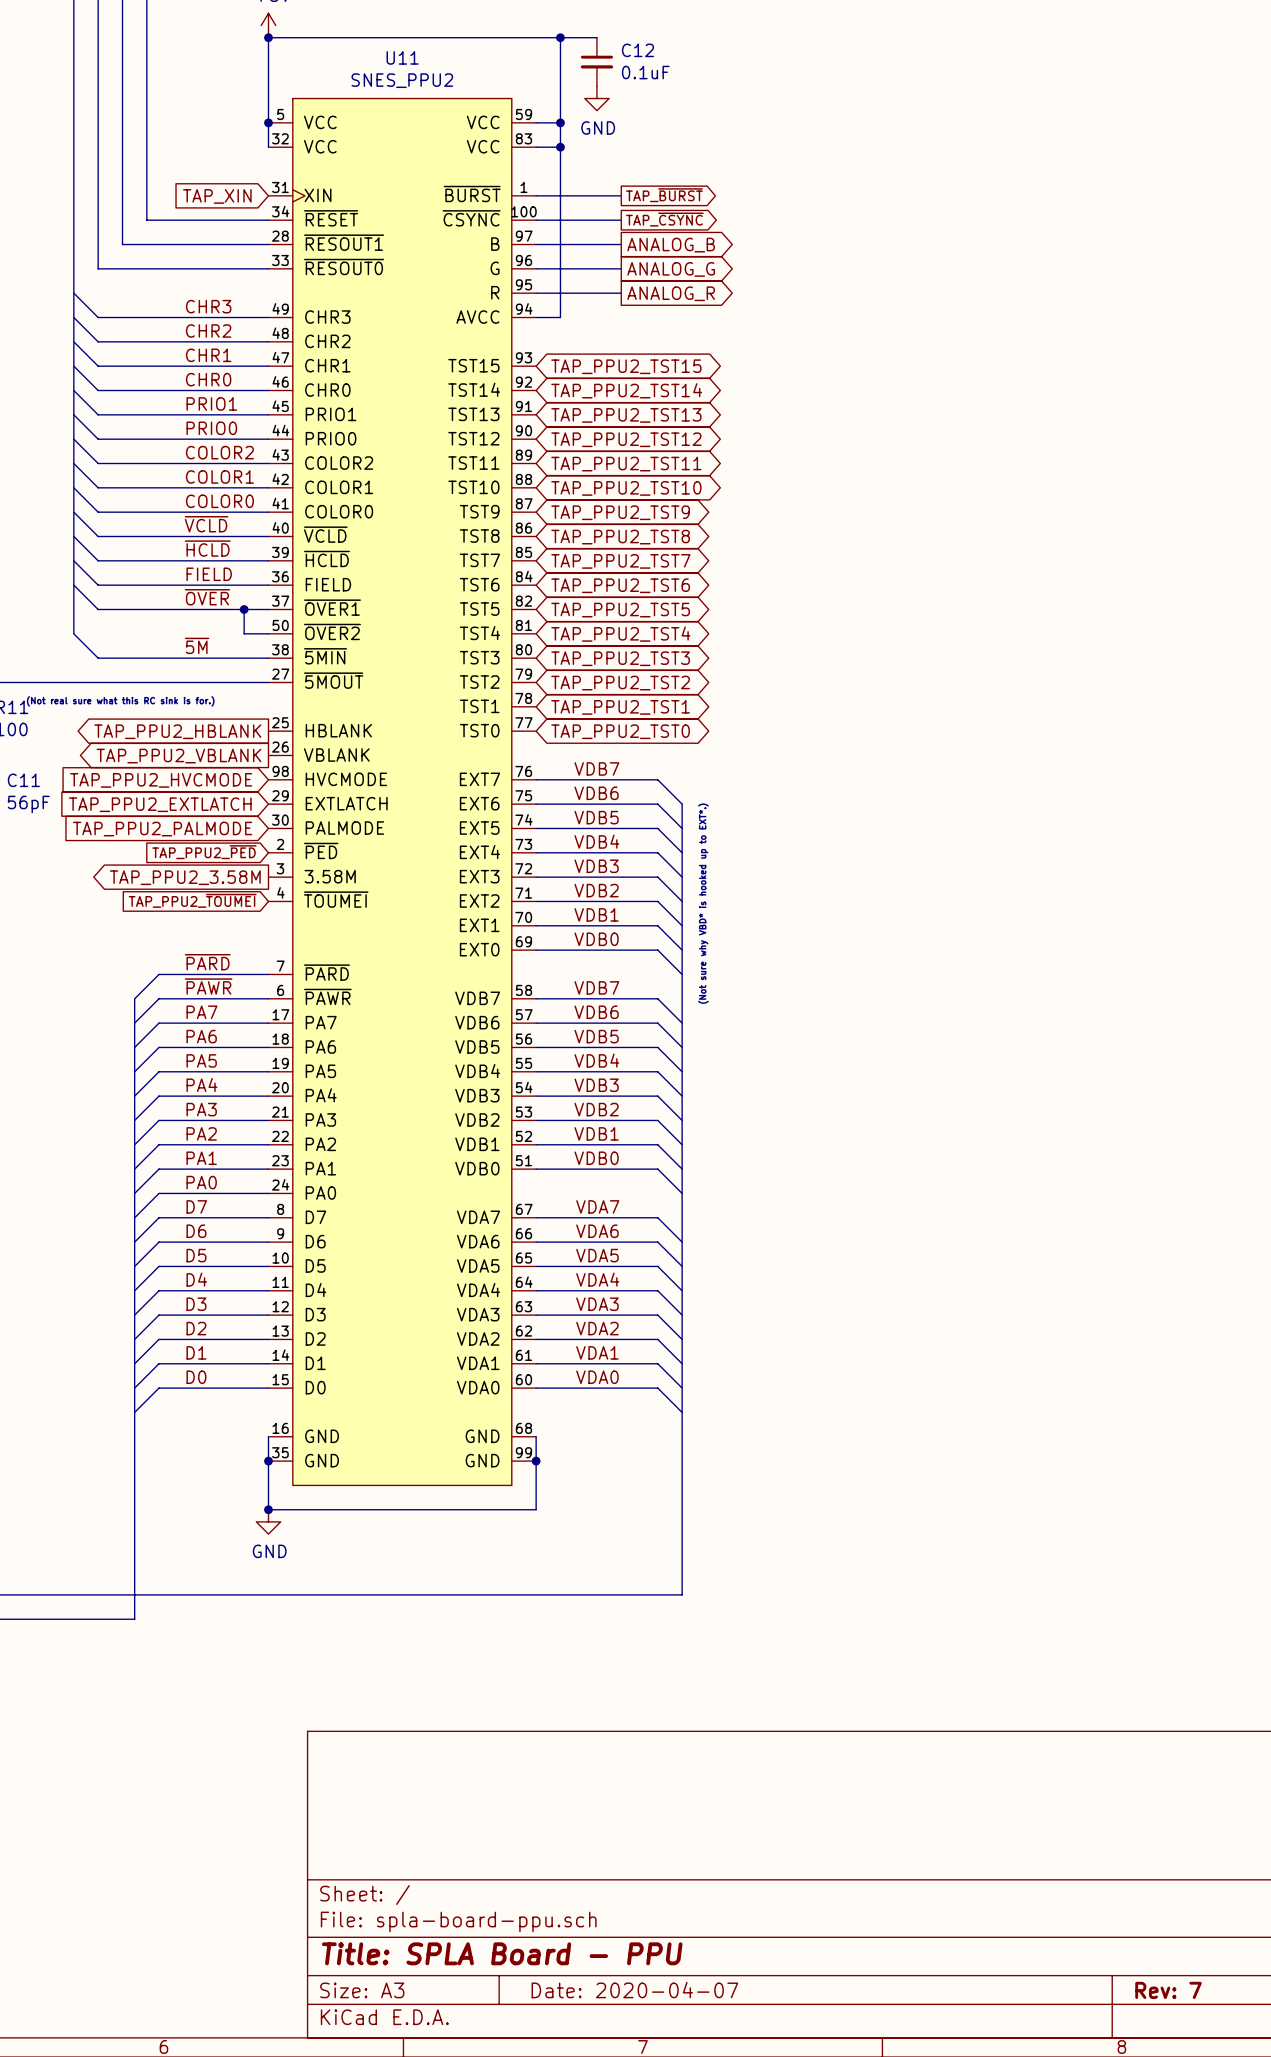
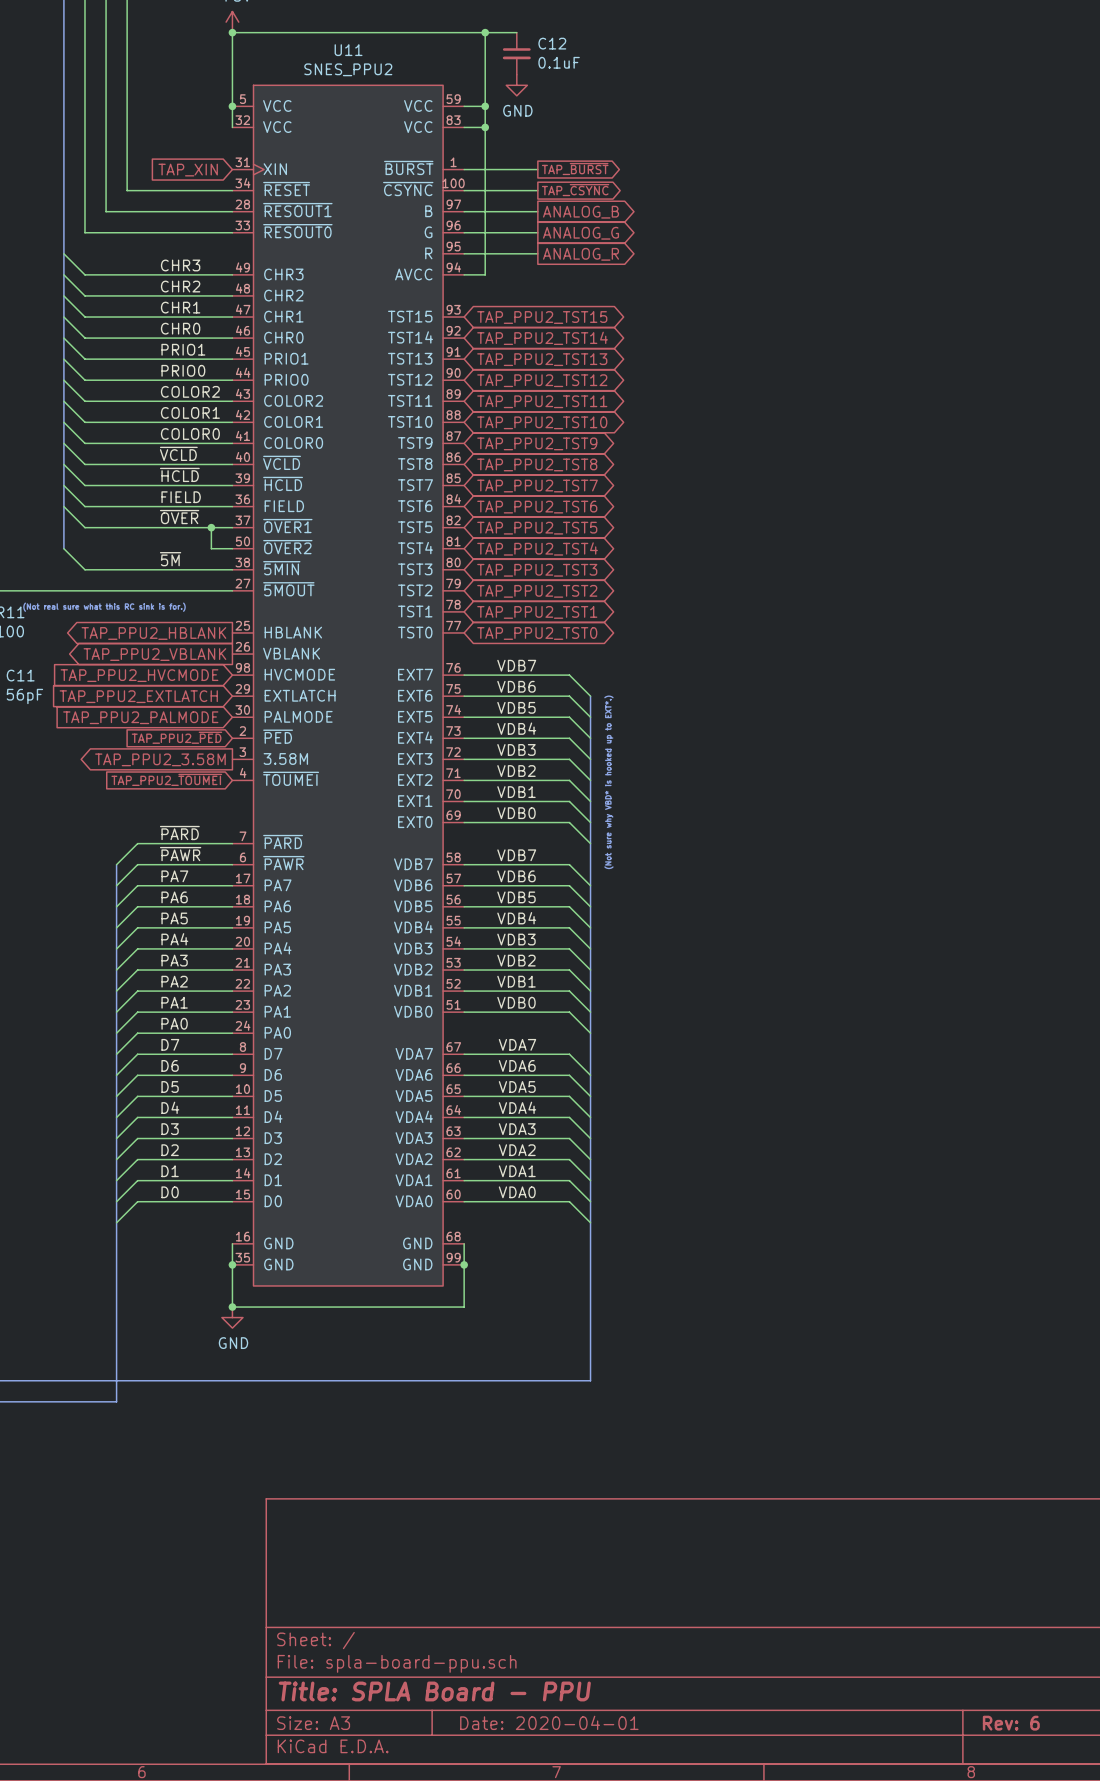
title block: Date: 2020-04-07 (634, 1990) -> Date: 2020-04-01 (549, 1722)
title block: Rev: 7 (1168, 1990) -> Rev: 6 (1011, 1723)

